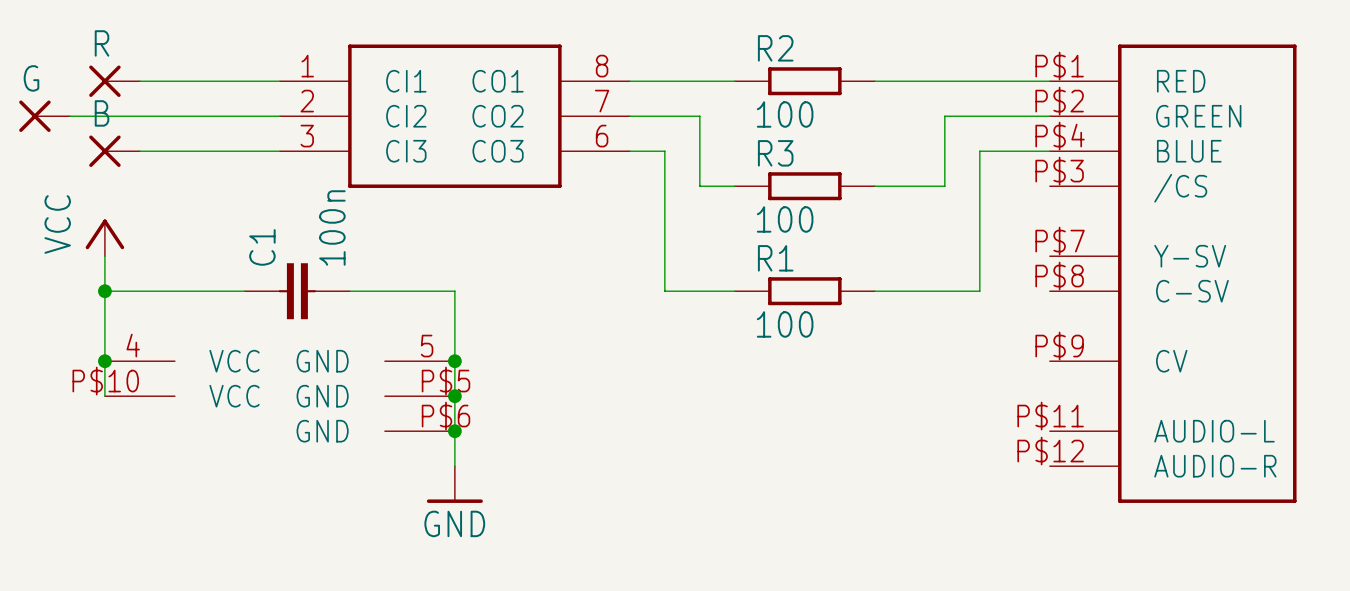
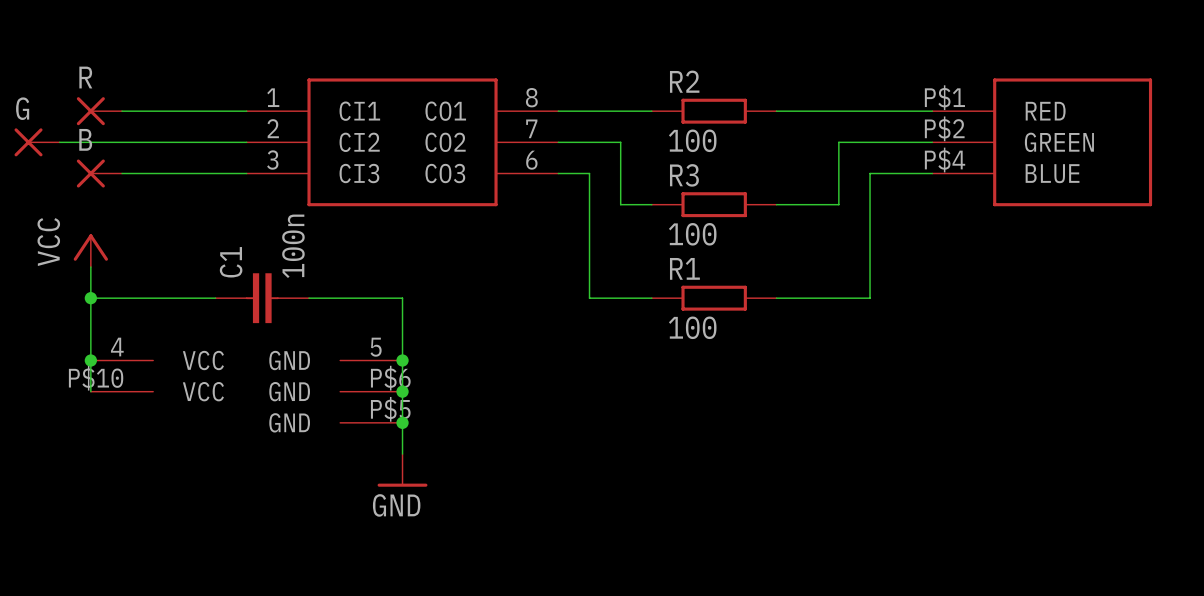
part: none -> (1042, 142)
part: (1173, 273) -> none
part pin number: P$5 (445, 381) -> P$6 (390, 378)
part pin number: P$6 (445, 416) -> P$5 (390, 409)

